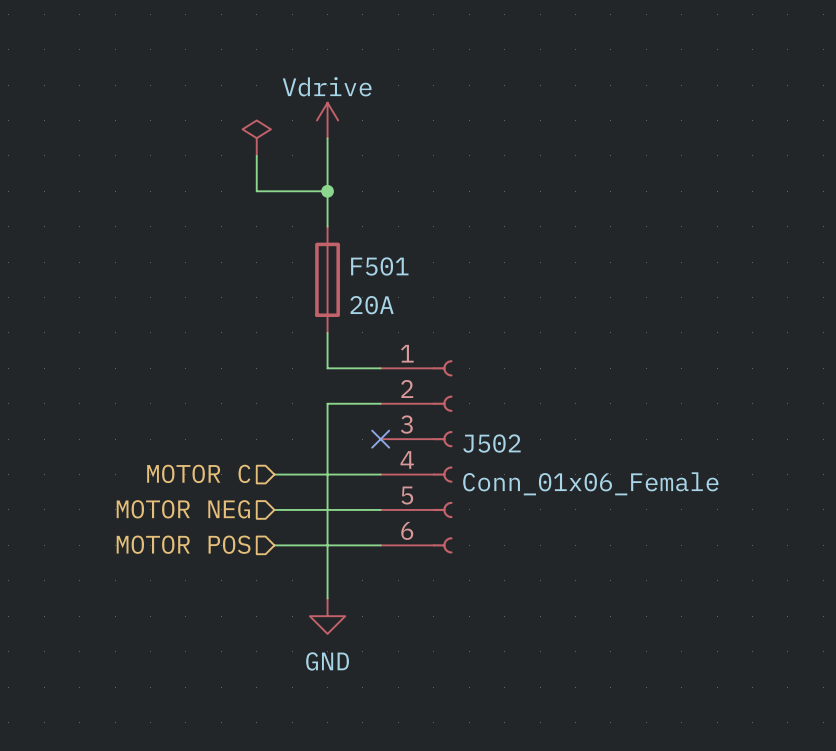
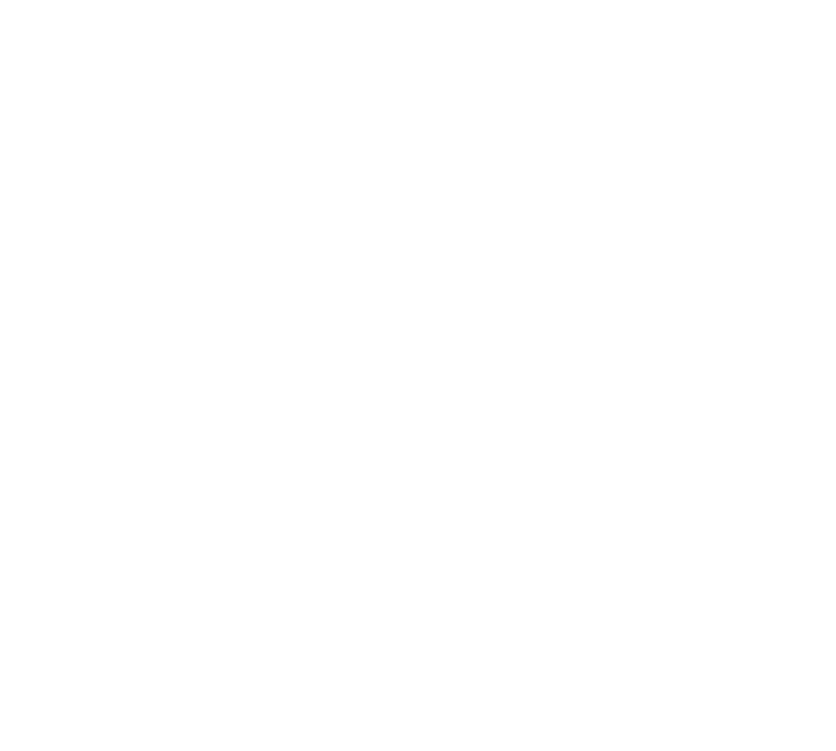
power symbol: Vdrive (327, 120) -> none
power symbol: (256, 138) -> none
wire: (327, 138) (327, 226) -> none
wire: (256, 155) (256, 191) (327, 191) -> none
junction: (327, 191) -> none
F501: 20A (327, 279) -> none
wire: (327, 332) (327, 368) (380, 368) -> none
wire: (380, 403) (327, 403) (327, 598) -> none
no-connect mark: (380, 439) -> none
J502: Conn_01x06_Female (416, 456) -> none
hierarchical label: MOTOR C (198, 473) -> none
wire: (274, 474) (380, 474) -> none
hierarchical label: MOTOR NEG (183, 509) -> none
wire: (274, 509) (380, 509) -> none
hierarchical label: MOTOR POS (183, 544) -> none
wire: (274, 545) (380, 545) -> none
power symbol: GND (327, 616) -> none

